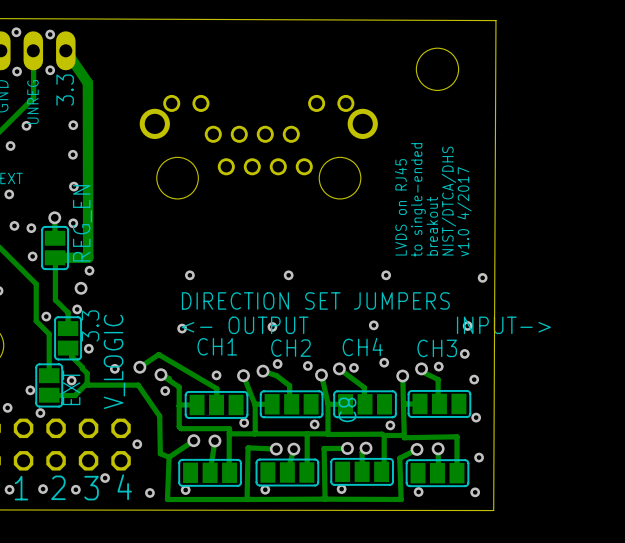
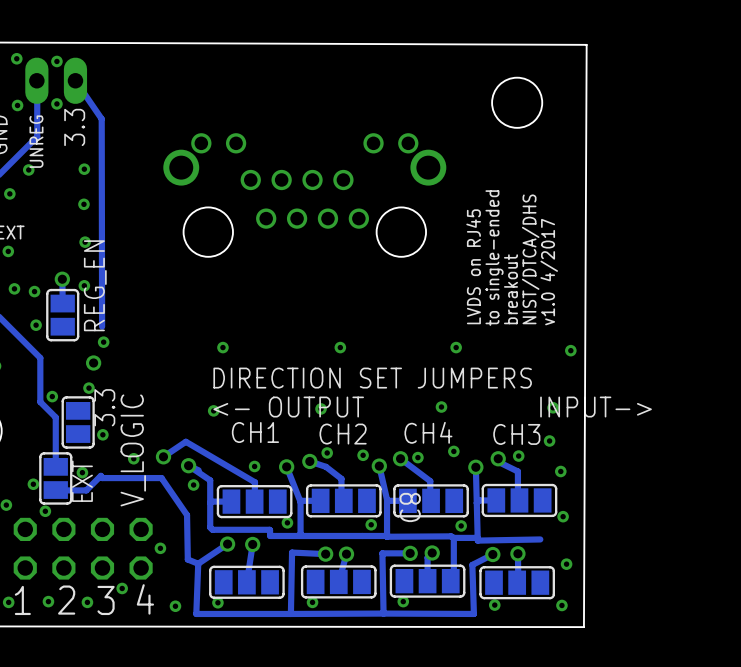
track width: thick (65, 50) (87, 82) (88, 257) -> thin (75, 80) (101, 118) (102, 326)
track: (88, 257) (55, 257) (55, 299) (68, 312) (68, 328) -> none
track: (68, 348) (71, 351) (71, 356) (87, 373) (87, 383) -> none
track: (229, 433) (229, 472) -> none
track: (307, 433) (306, 472) -> none
track: (456, 436) (456, 473) -> none

